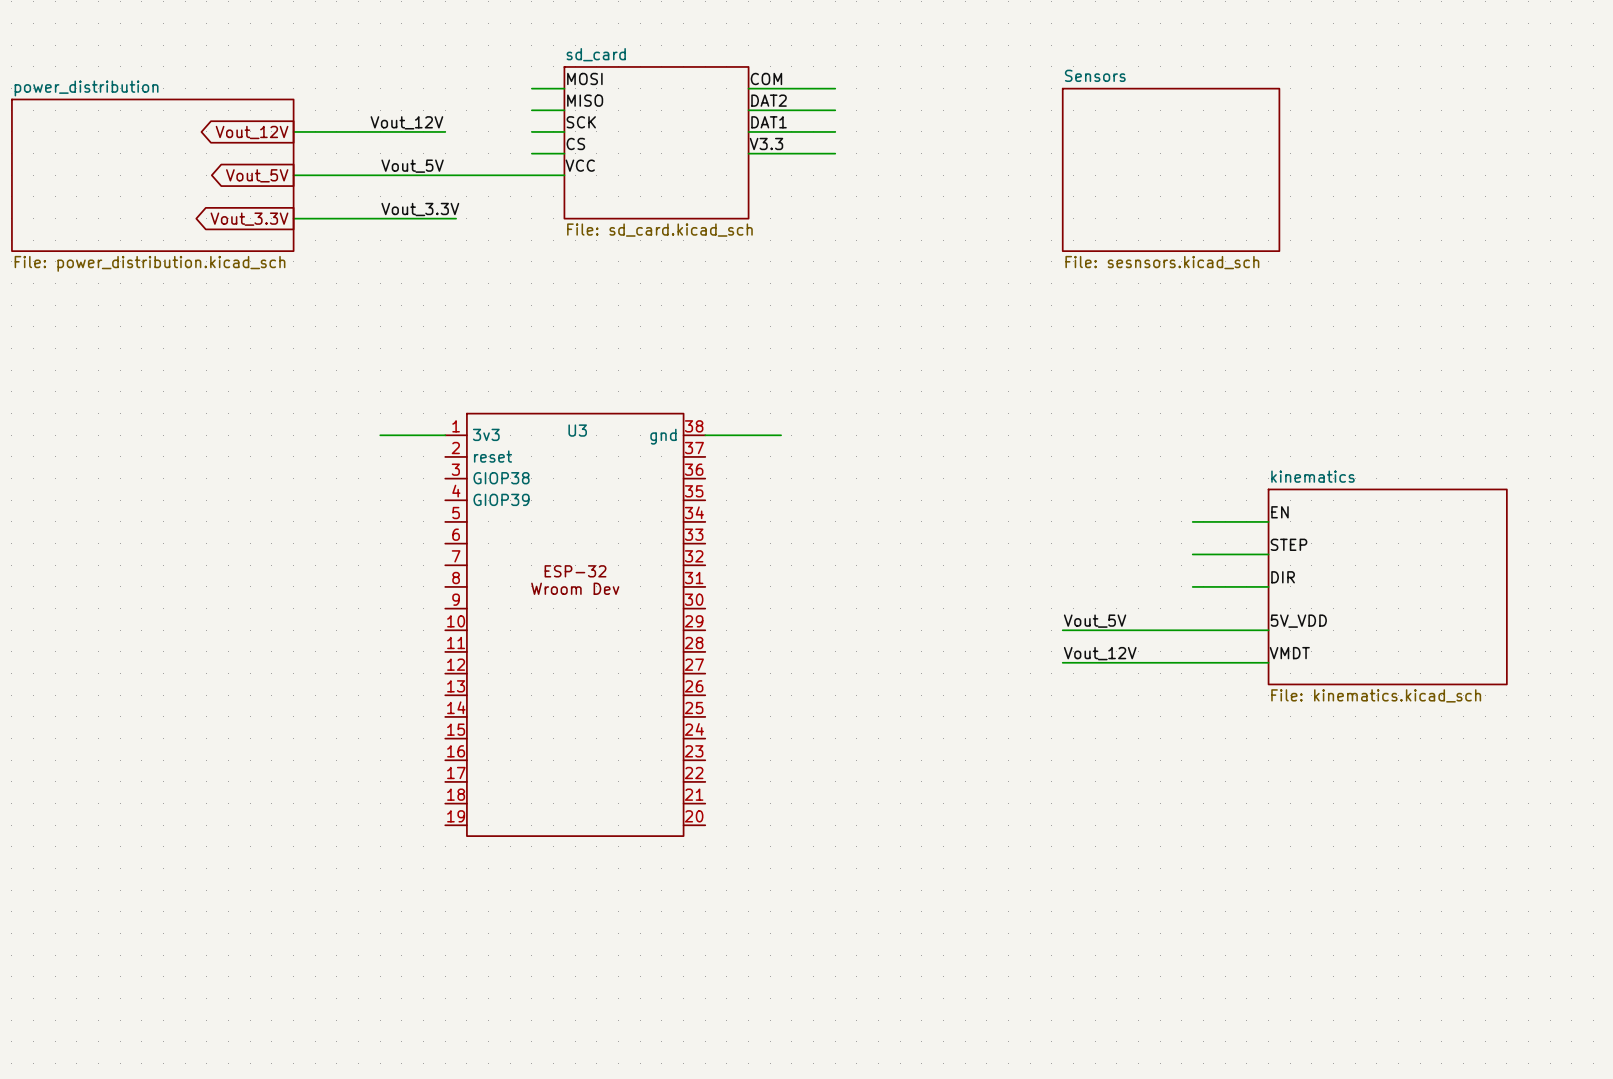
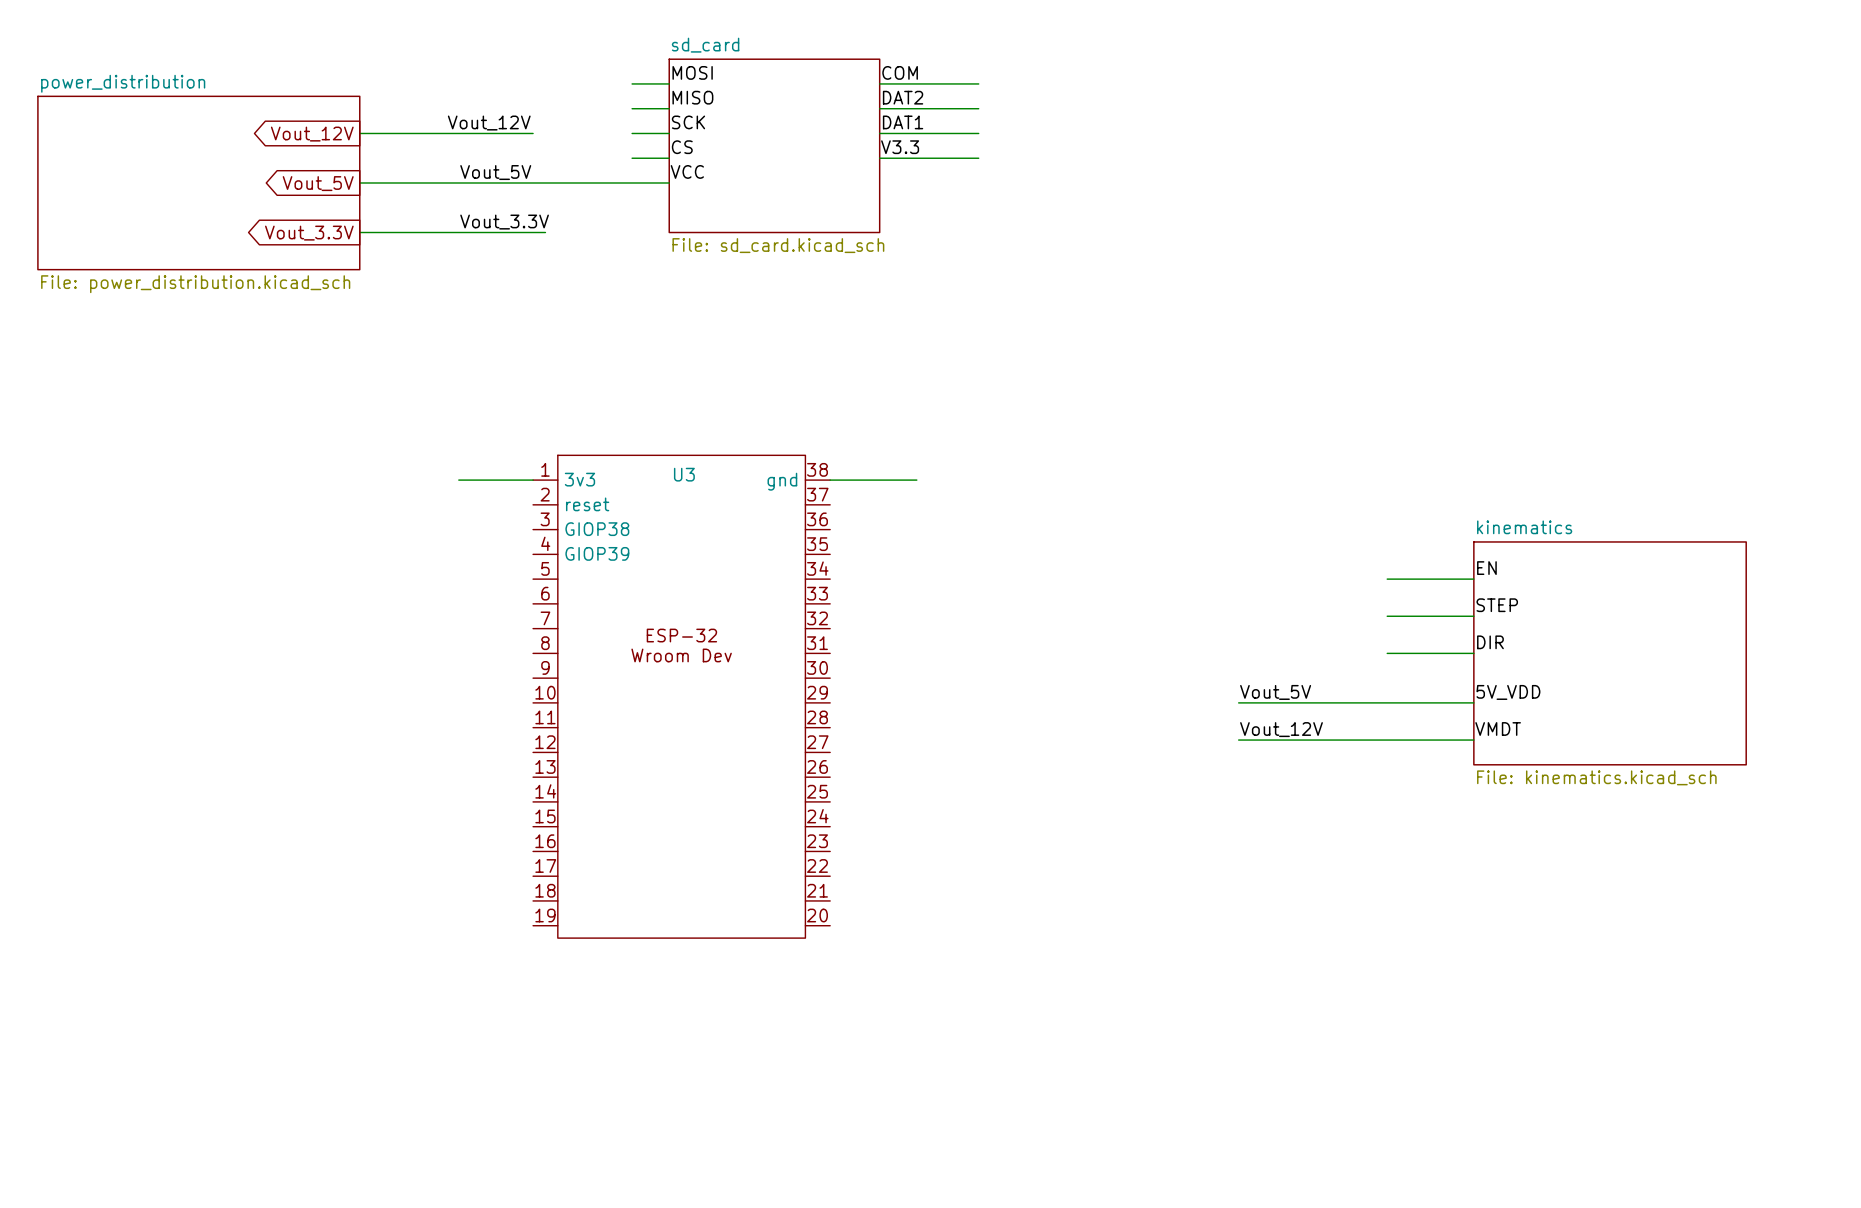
sheet Sensors: File: sesnsors.kicad_sch (1171, 169) -> none

